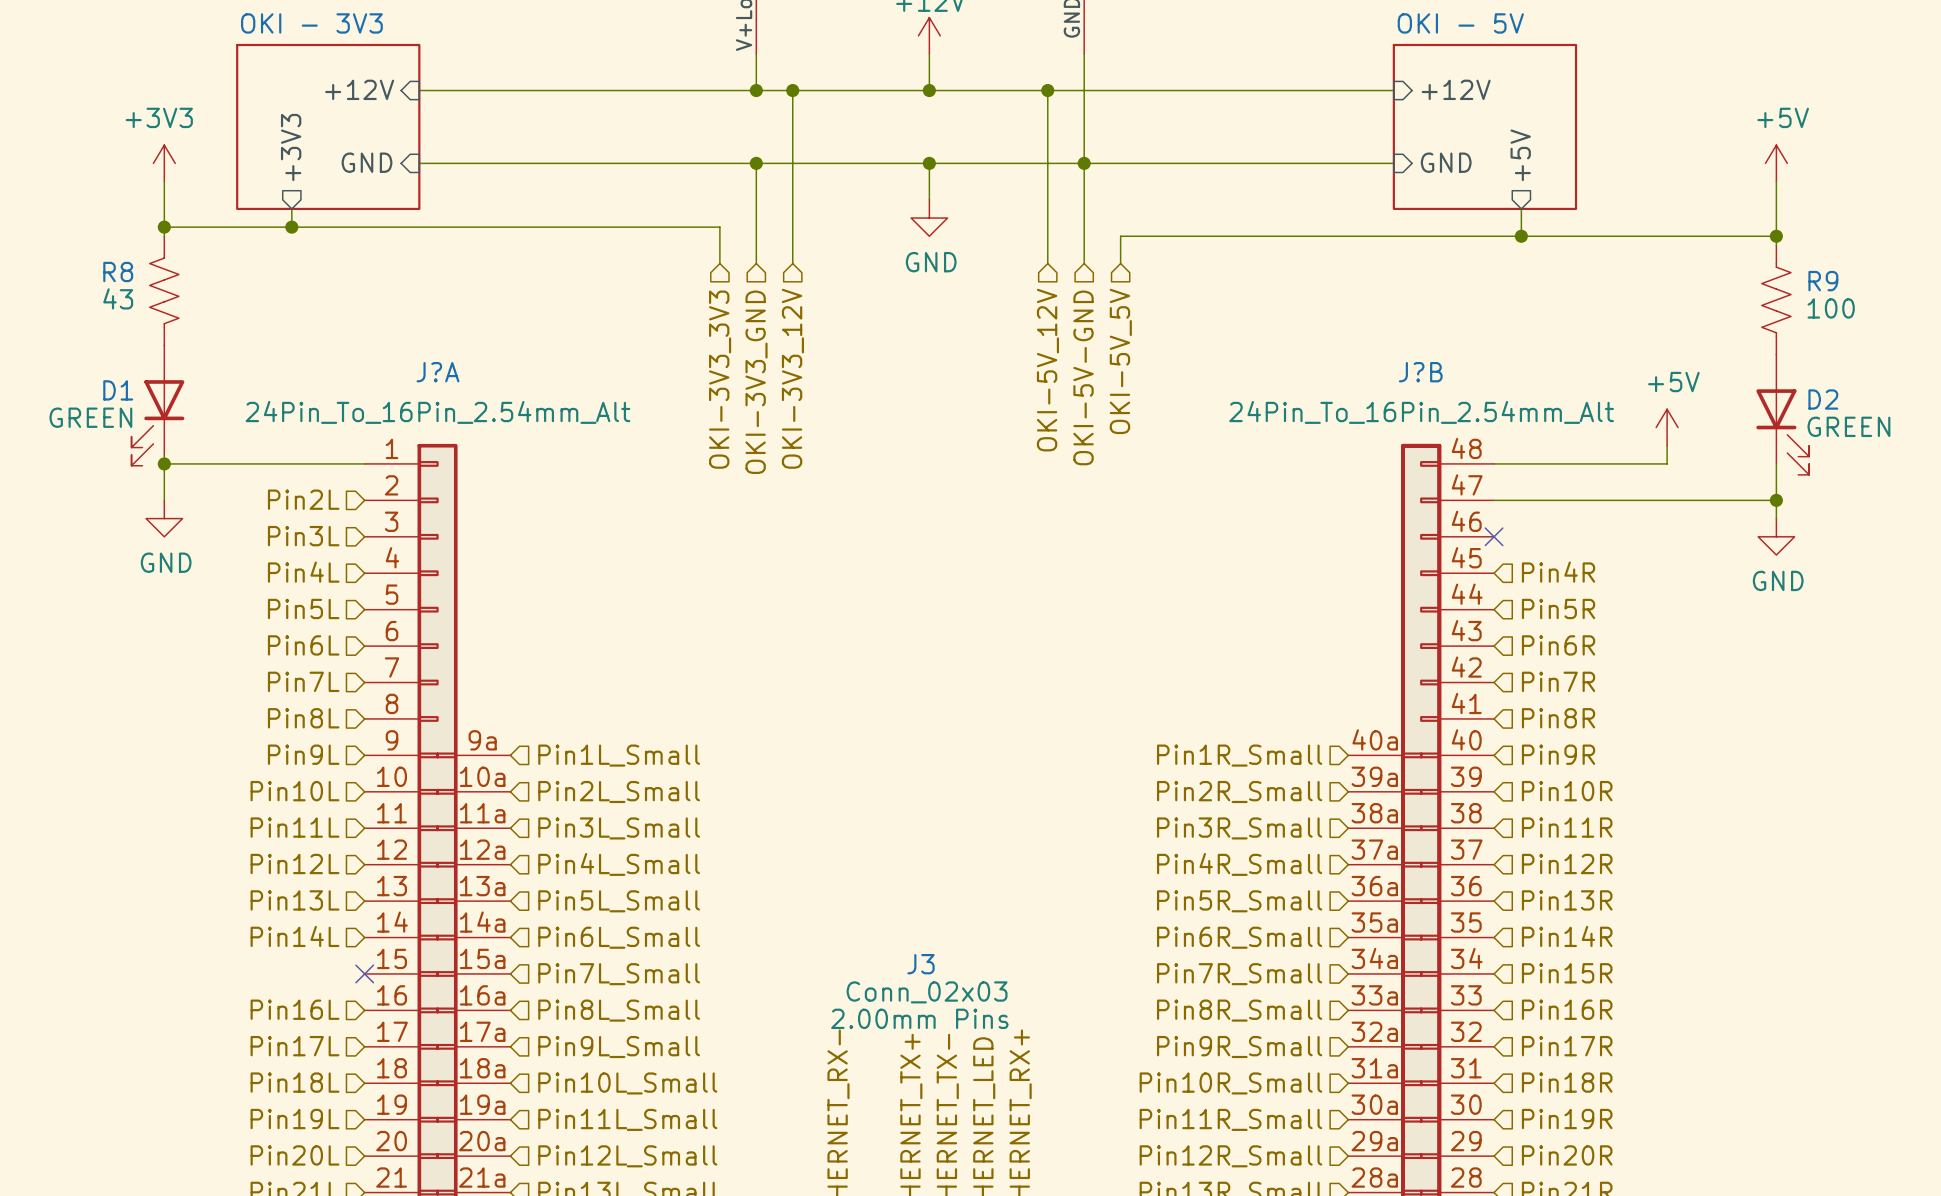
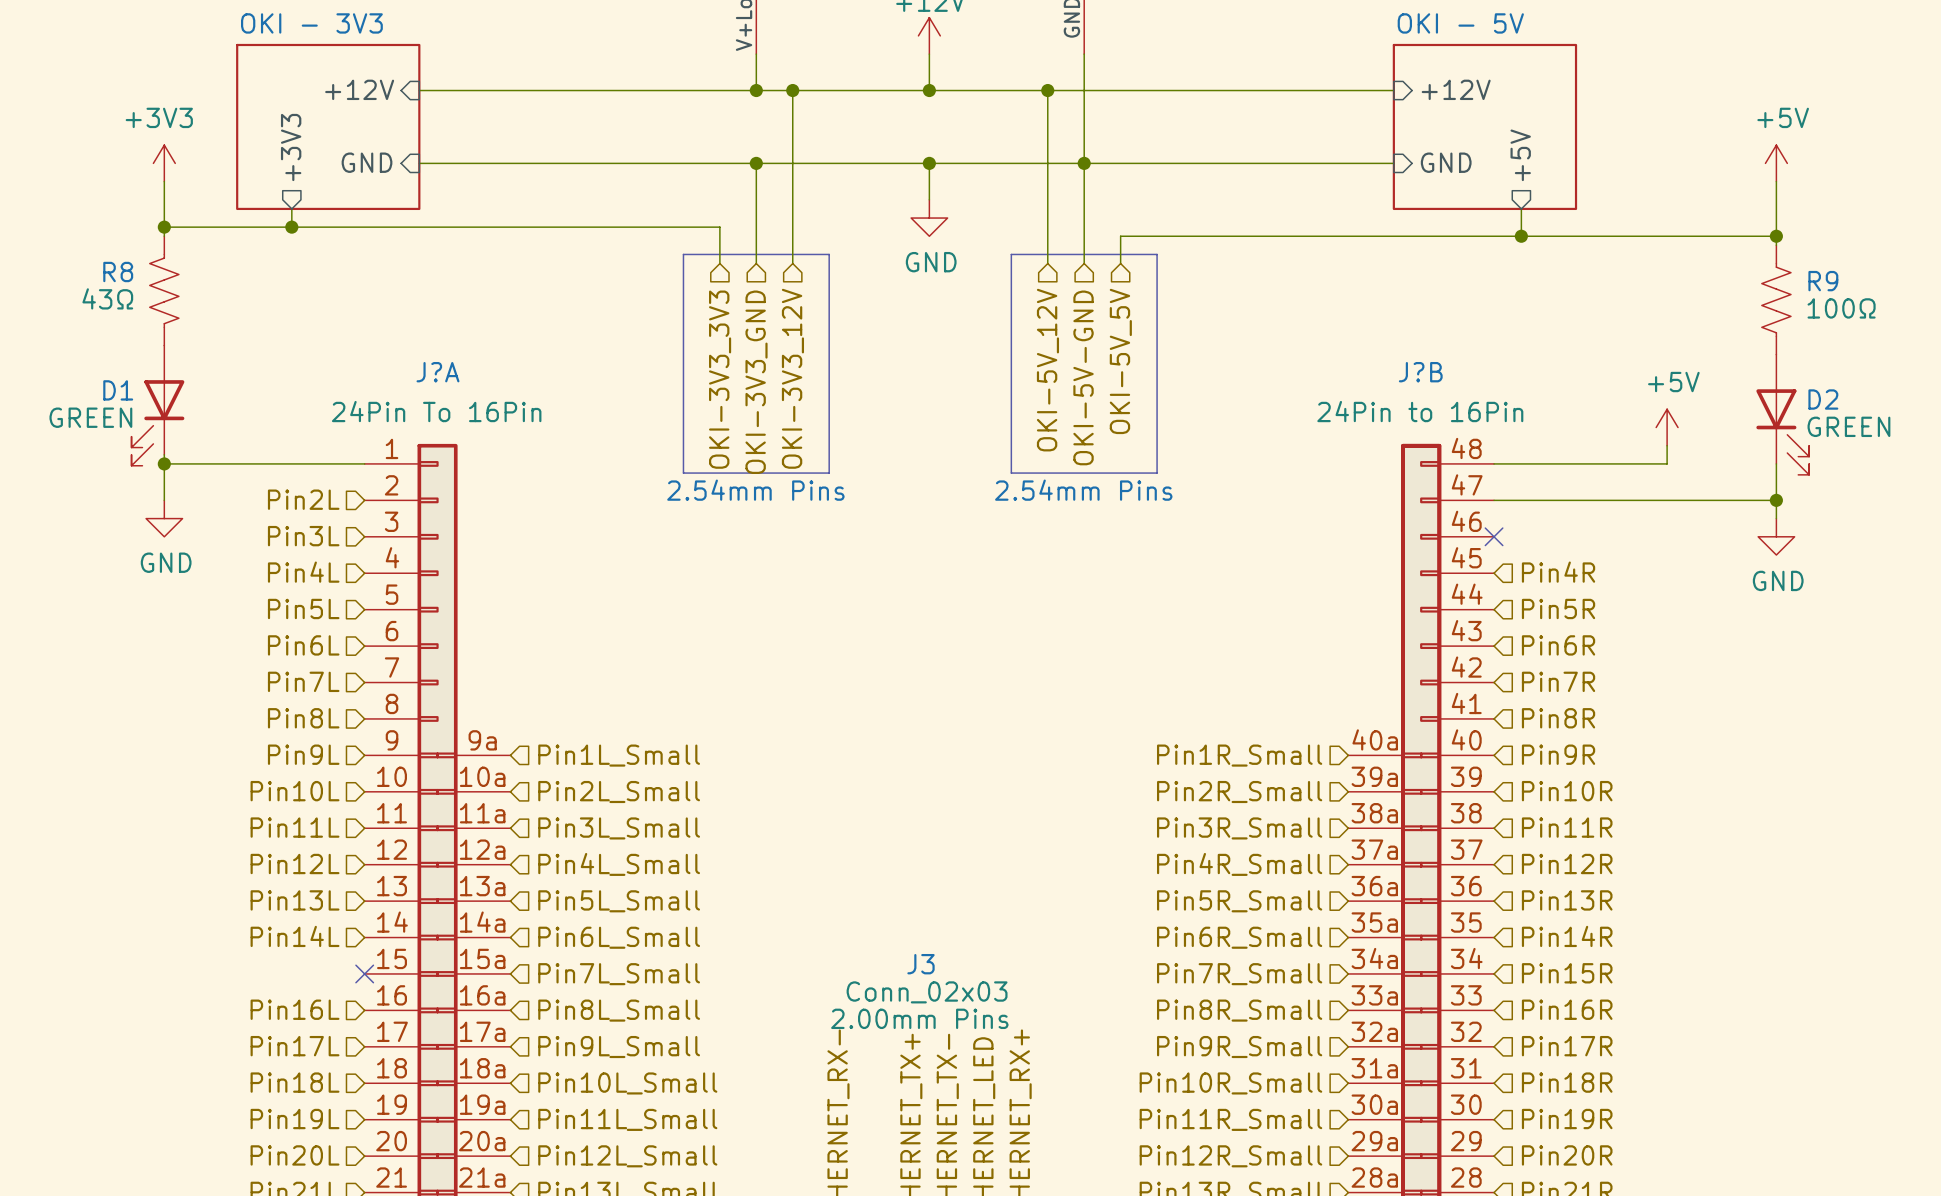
line: none -> (683, 254) (829, 254) (829, 473) (683, 473) (683, 254)
line: none -> (1011, 254) (1157, 254) (1157, 473) (1011, 473) (1011, 254)
R8 value: 43 (118, 298) -> 43Ω (107, 298)
R9 value: 100 (1831, 308) -> 100Ω (1841, 308)
J?A value: 24Pin_To_16Pin_2.54mm_Alt (437, 412) -> 24Pin To 16Pin (436, 411)
J?B value: 24Pin_To_16Pin_2.54mm_Alt (1421, 412) -> 24Pin to 16Pin (1420, 411)
sheet OKI - 3V3 text: none -> 2.54mm Pins (755, 490)
sheet OKI - 5V text: none -> 2.54mm Pins (1083, 490)

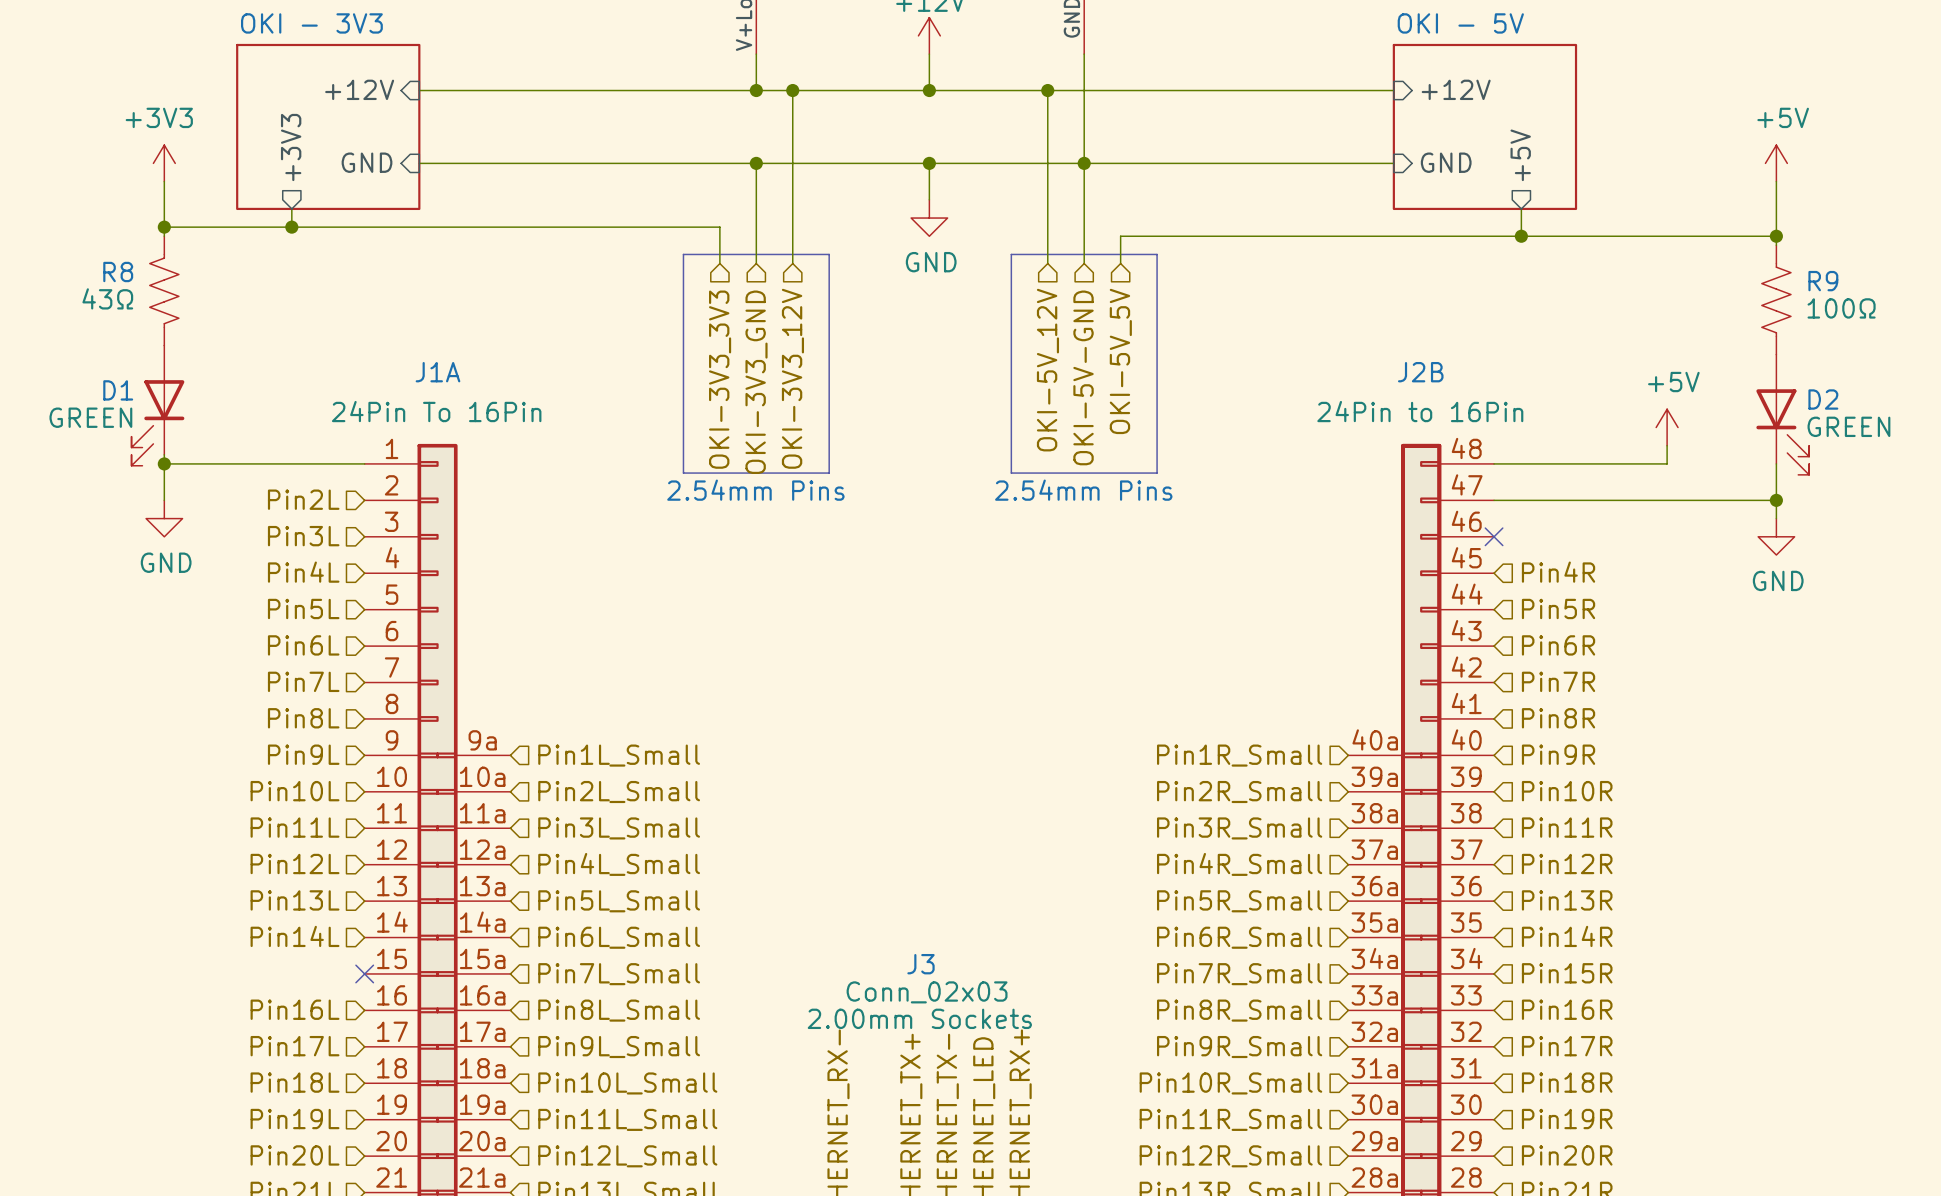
J?A name: J?A (437, 372) -> J1A (437, 372)
J?B name: J?B (1420, 372) -> J2B (1420, 372)
J3 text: 2.00mm Pins (919, 1018) -> 2.00mm Sockets (919, 1018)

